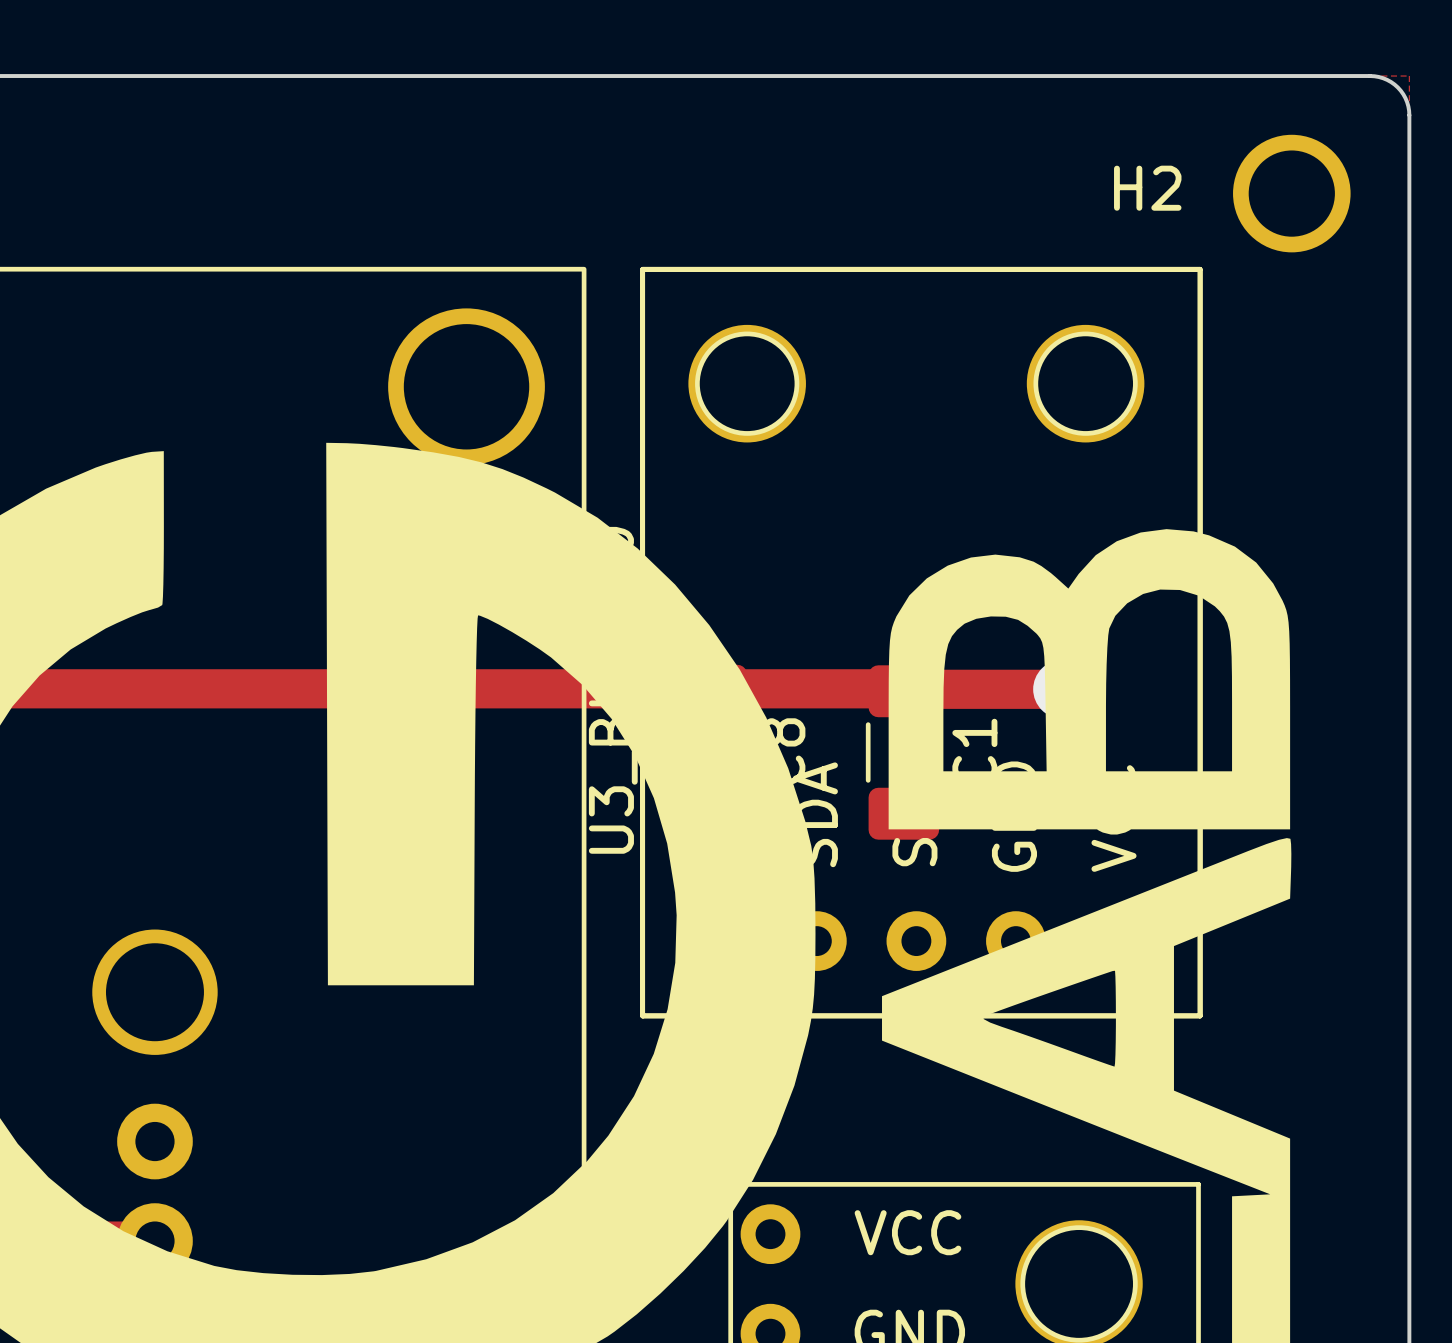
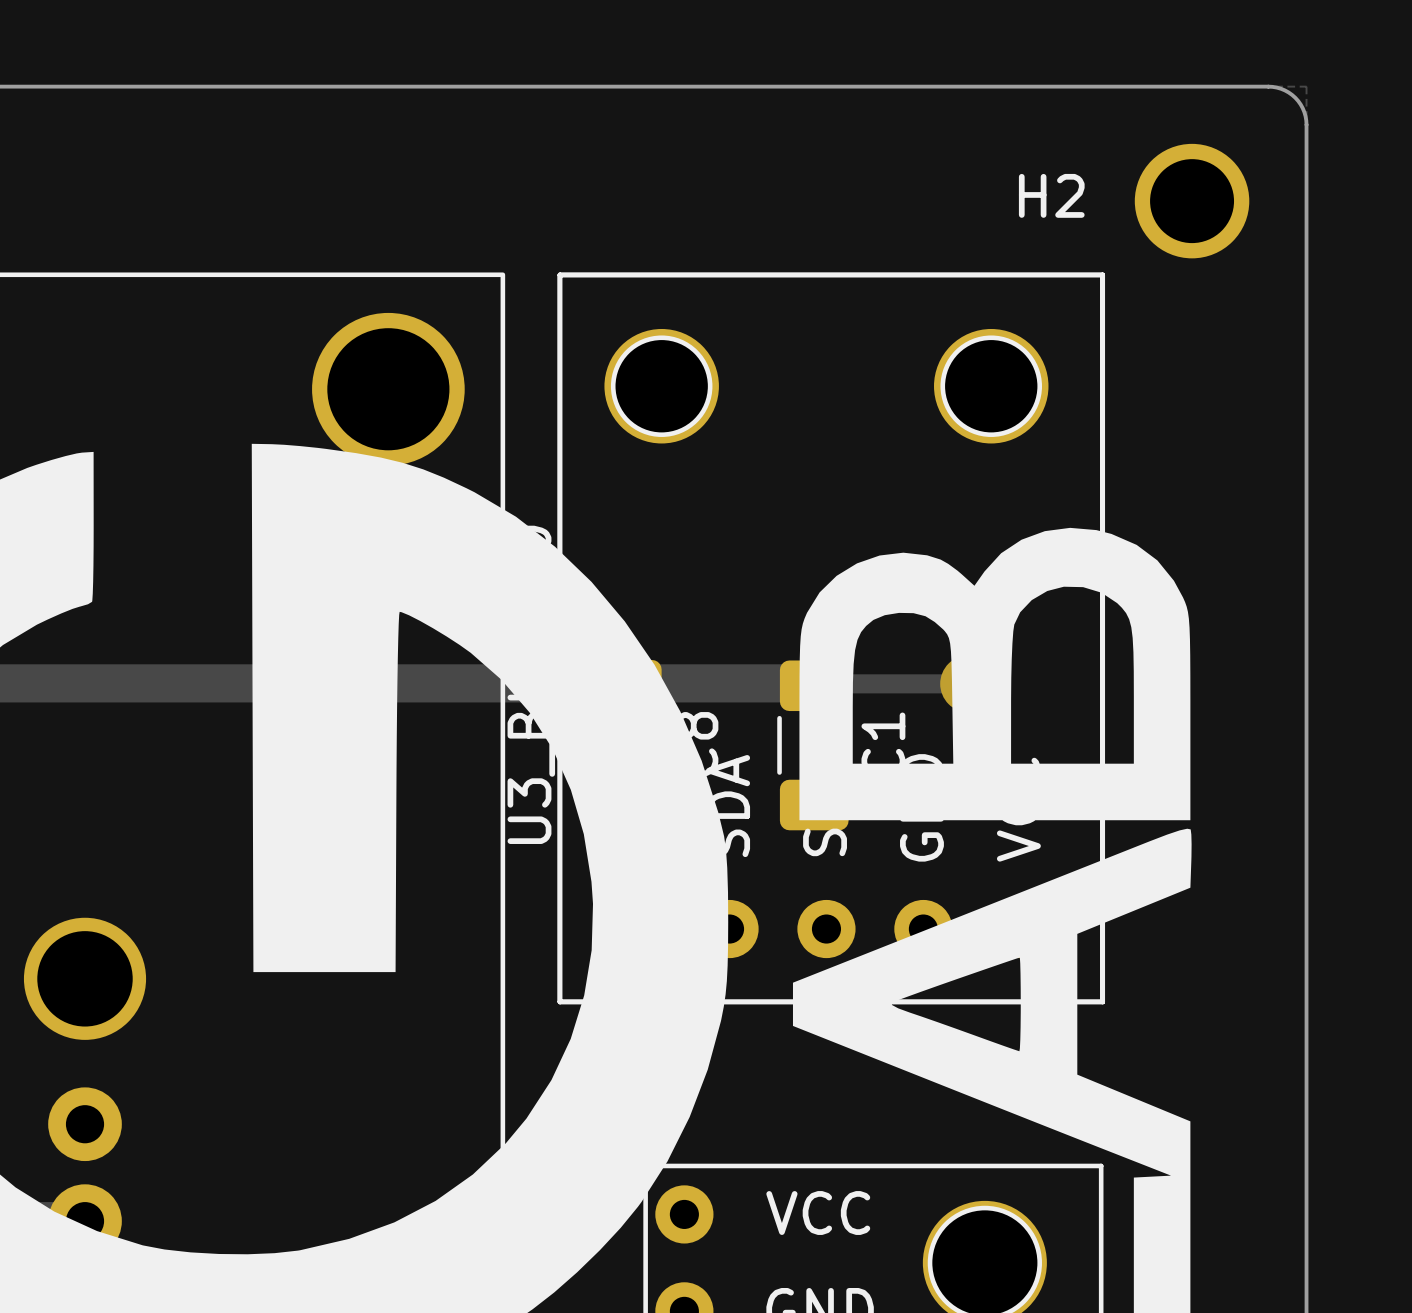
track width: thick (904, 689) (1062, 689) -> thin (814, 683) (968, 683)

